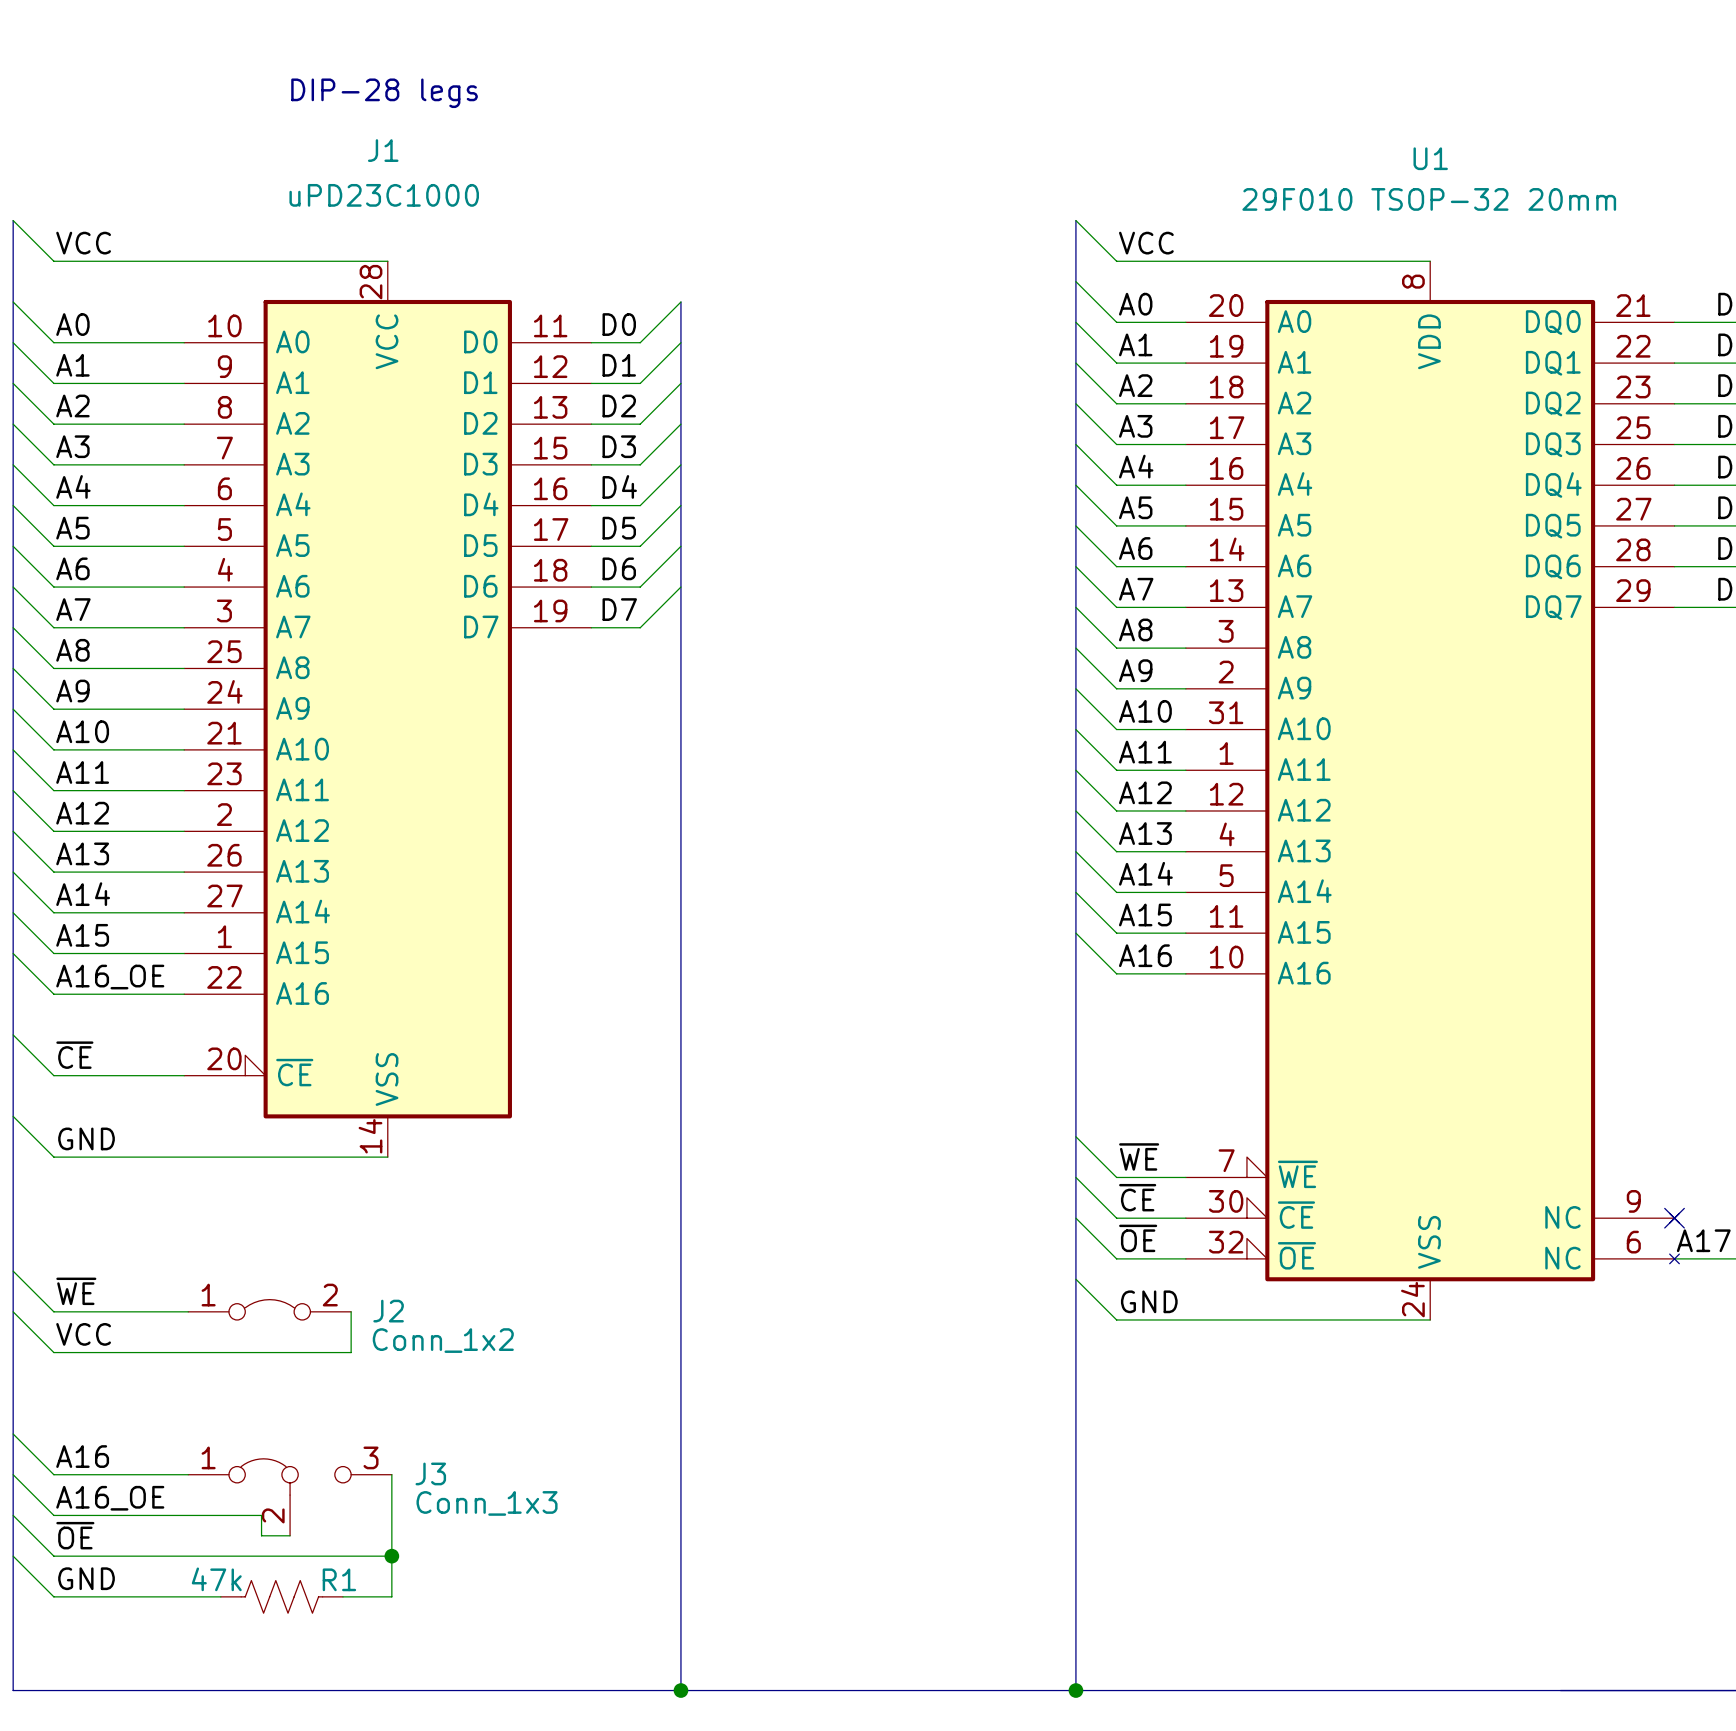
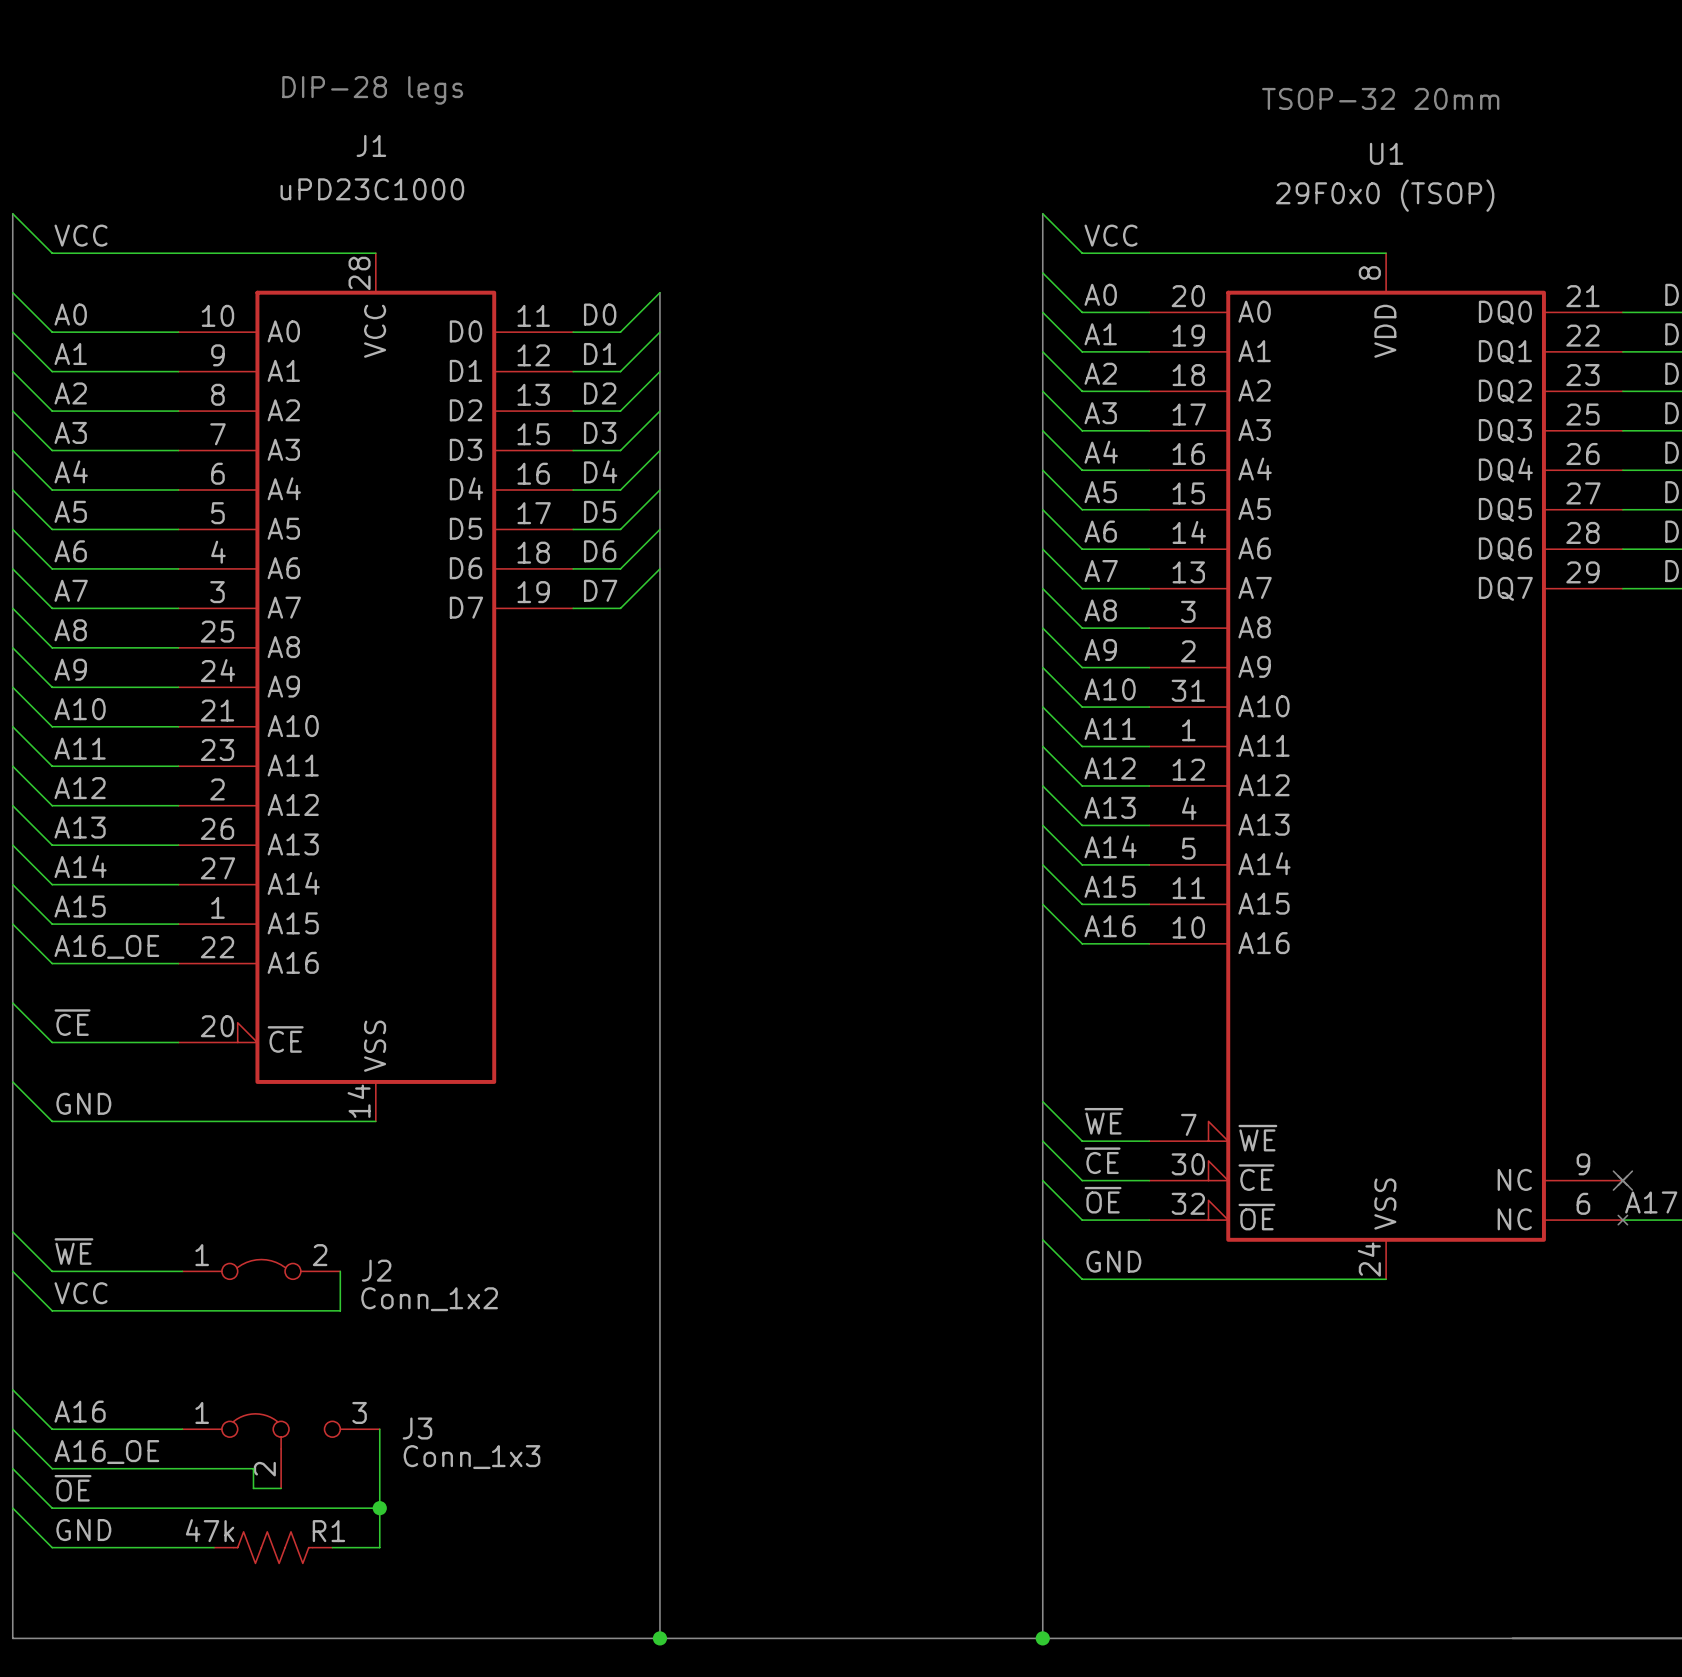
text: none -> TSOP-32 20mm (1380, 98)
U1 value: 29F010 TSOP-32 20mm (1429, 199) -> 29F0x0 (TSOP) (1385, 195)

